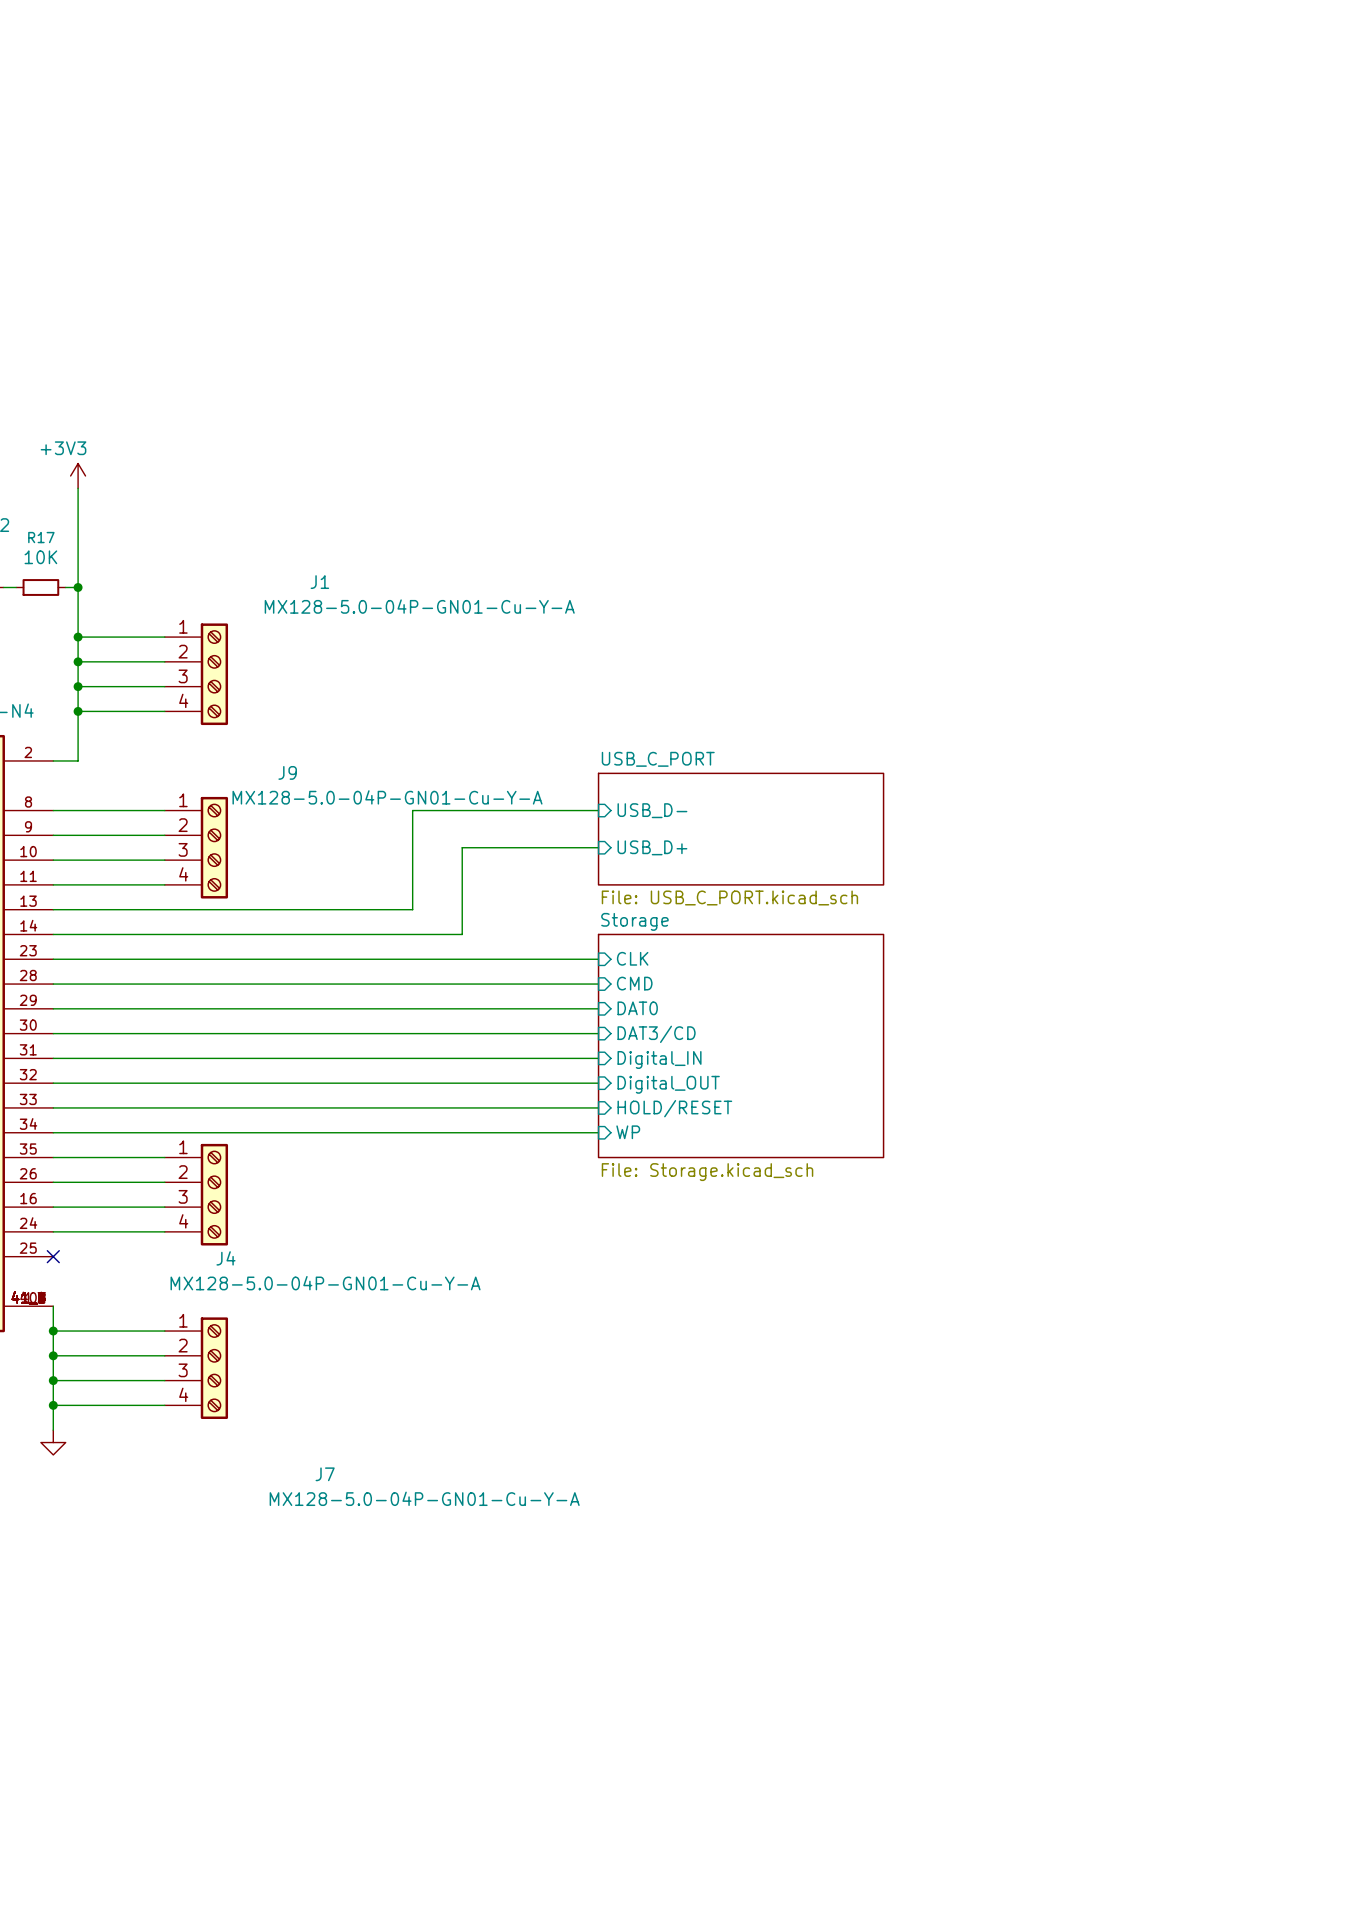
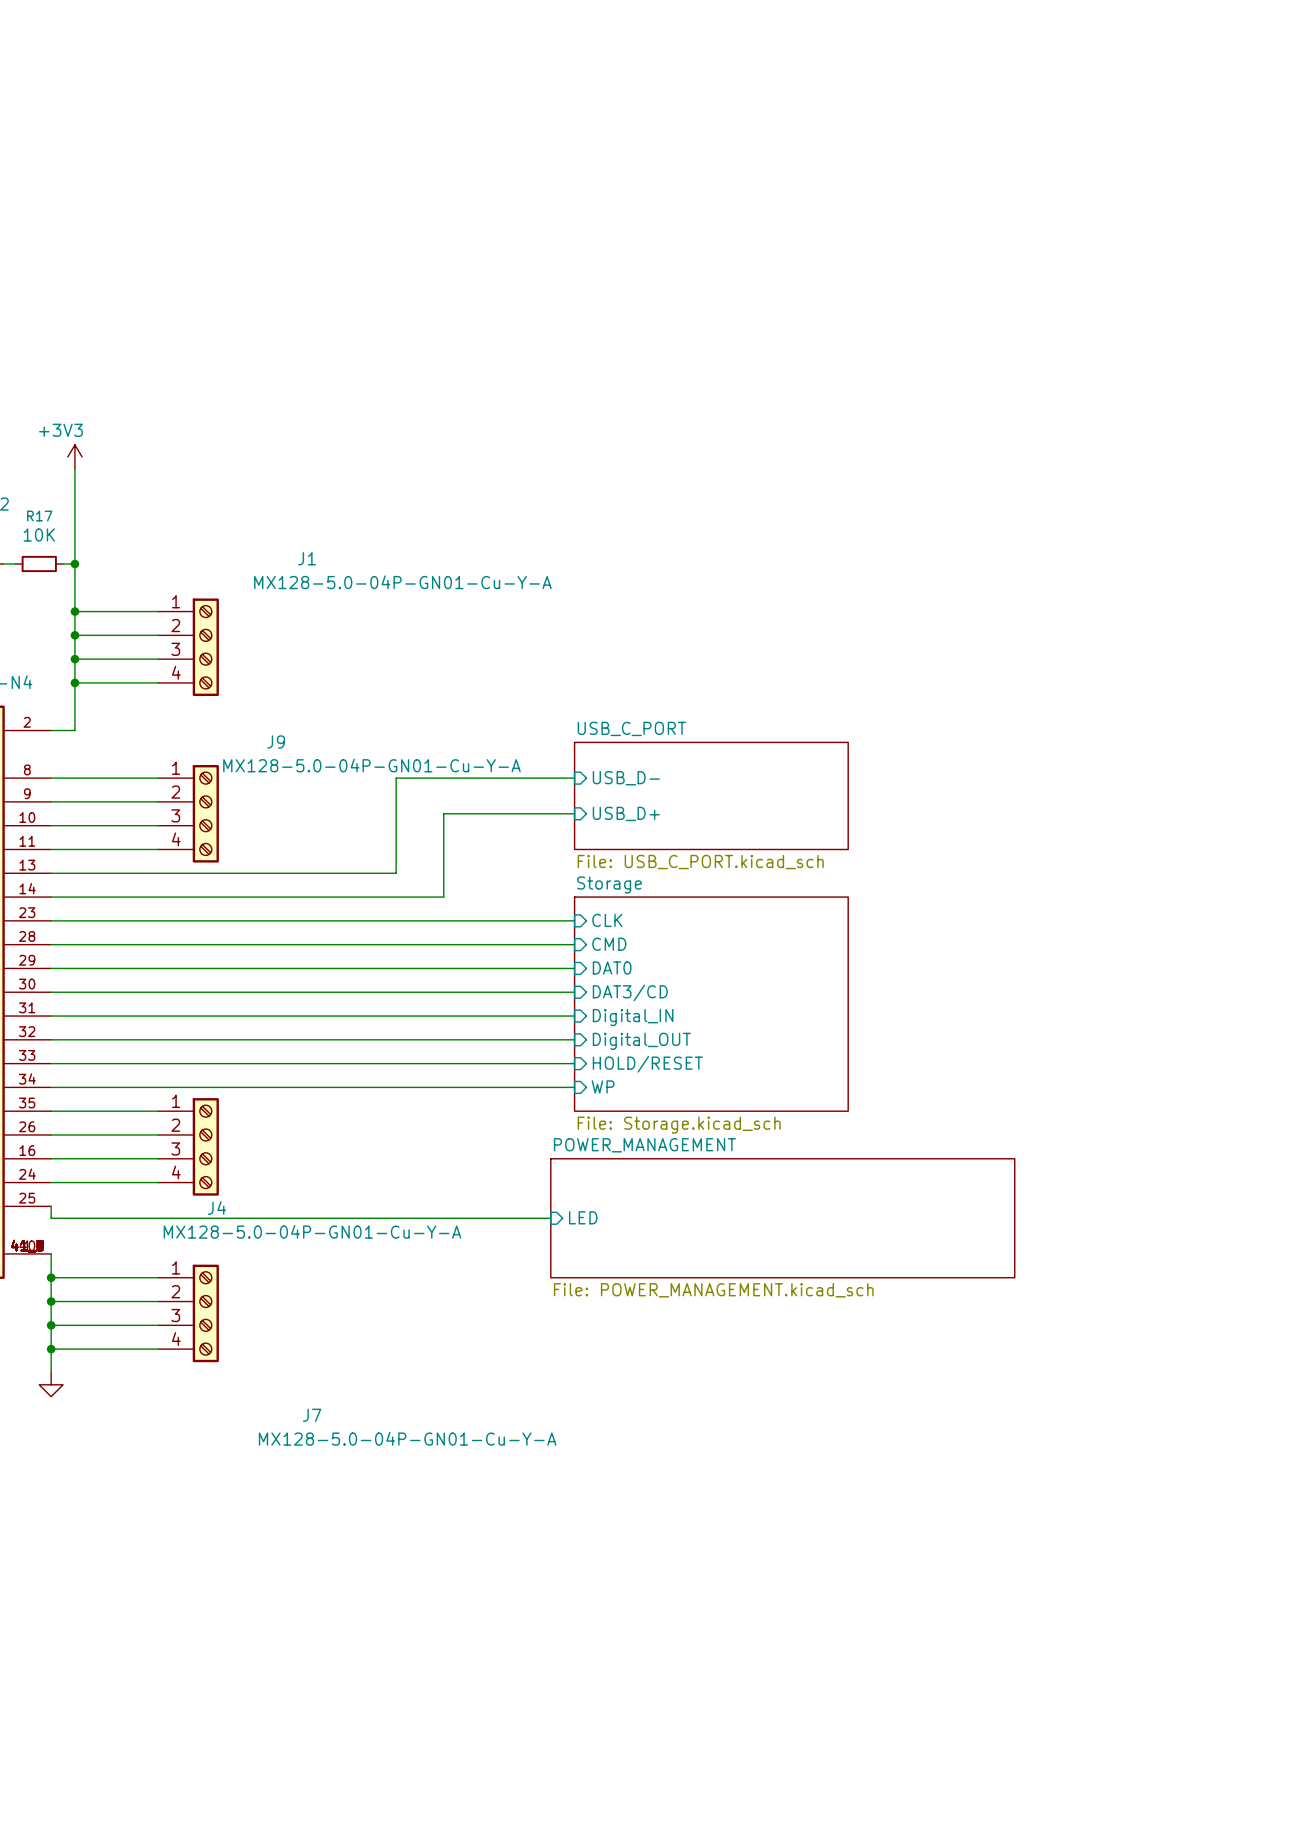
wire: none -> (51, 1206) (51, 1218) (550, 1218)
no-connect mark: (53, 1256) -> none
sheet pin: none -> LED (583, 1217)
sheet POWER_MANAGEMENT: none -> File: POWER_MANAGEMENT.kicad_sch (782, 1218)

